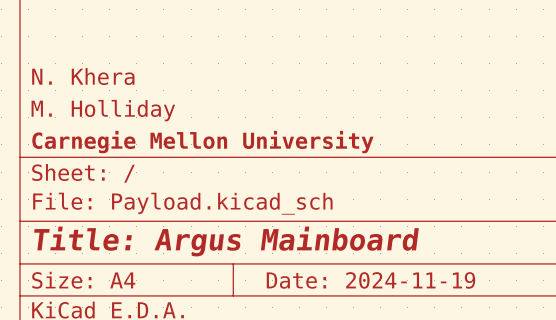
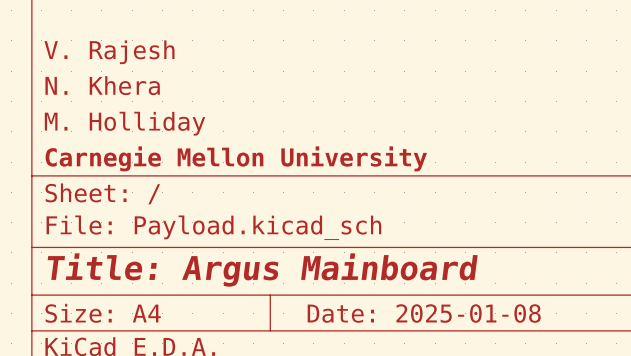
title block: none -> V. Rajesh (109, 52)
title block: Date: 2024-11-19 (370, 280) -> Date: 2025-01-08 (424, 313)

